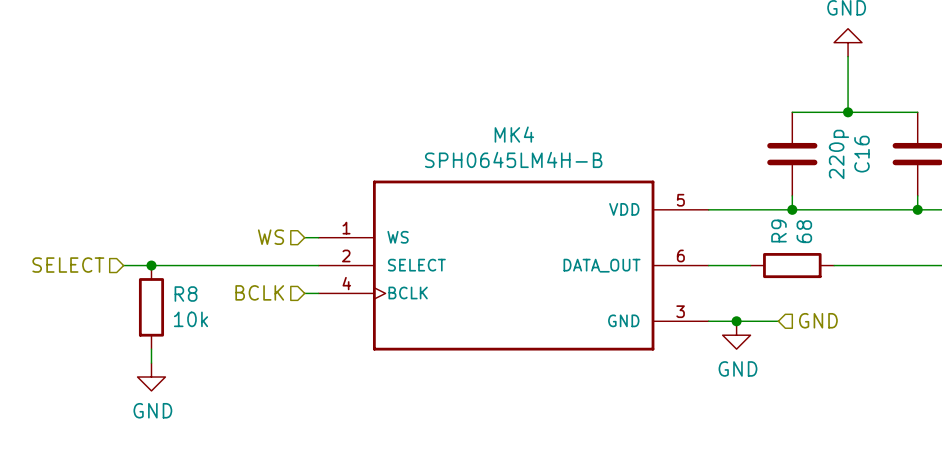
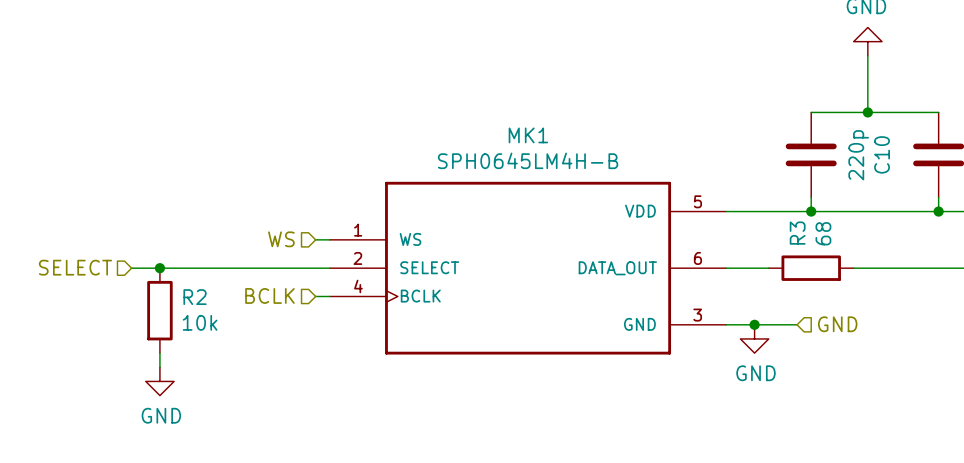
MK4 name: MK4 (514, 134) -> MK1 (528, 135)
C16 name: C16 (862, 154) -> C10 (882, 154)
R9 name: R9 (778, 231) -> R3 (797, 233)
R8 name: R8 (186, 294) -> R2 (195, 297)

